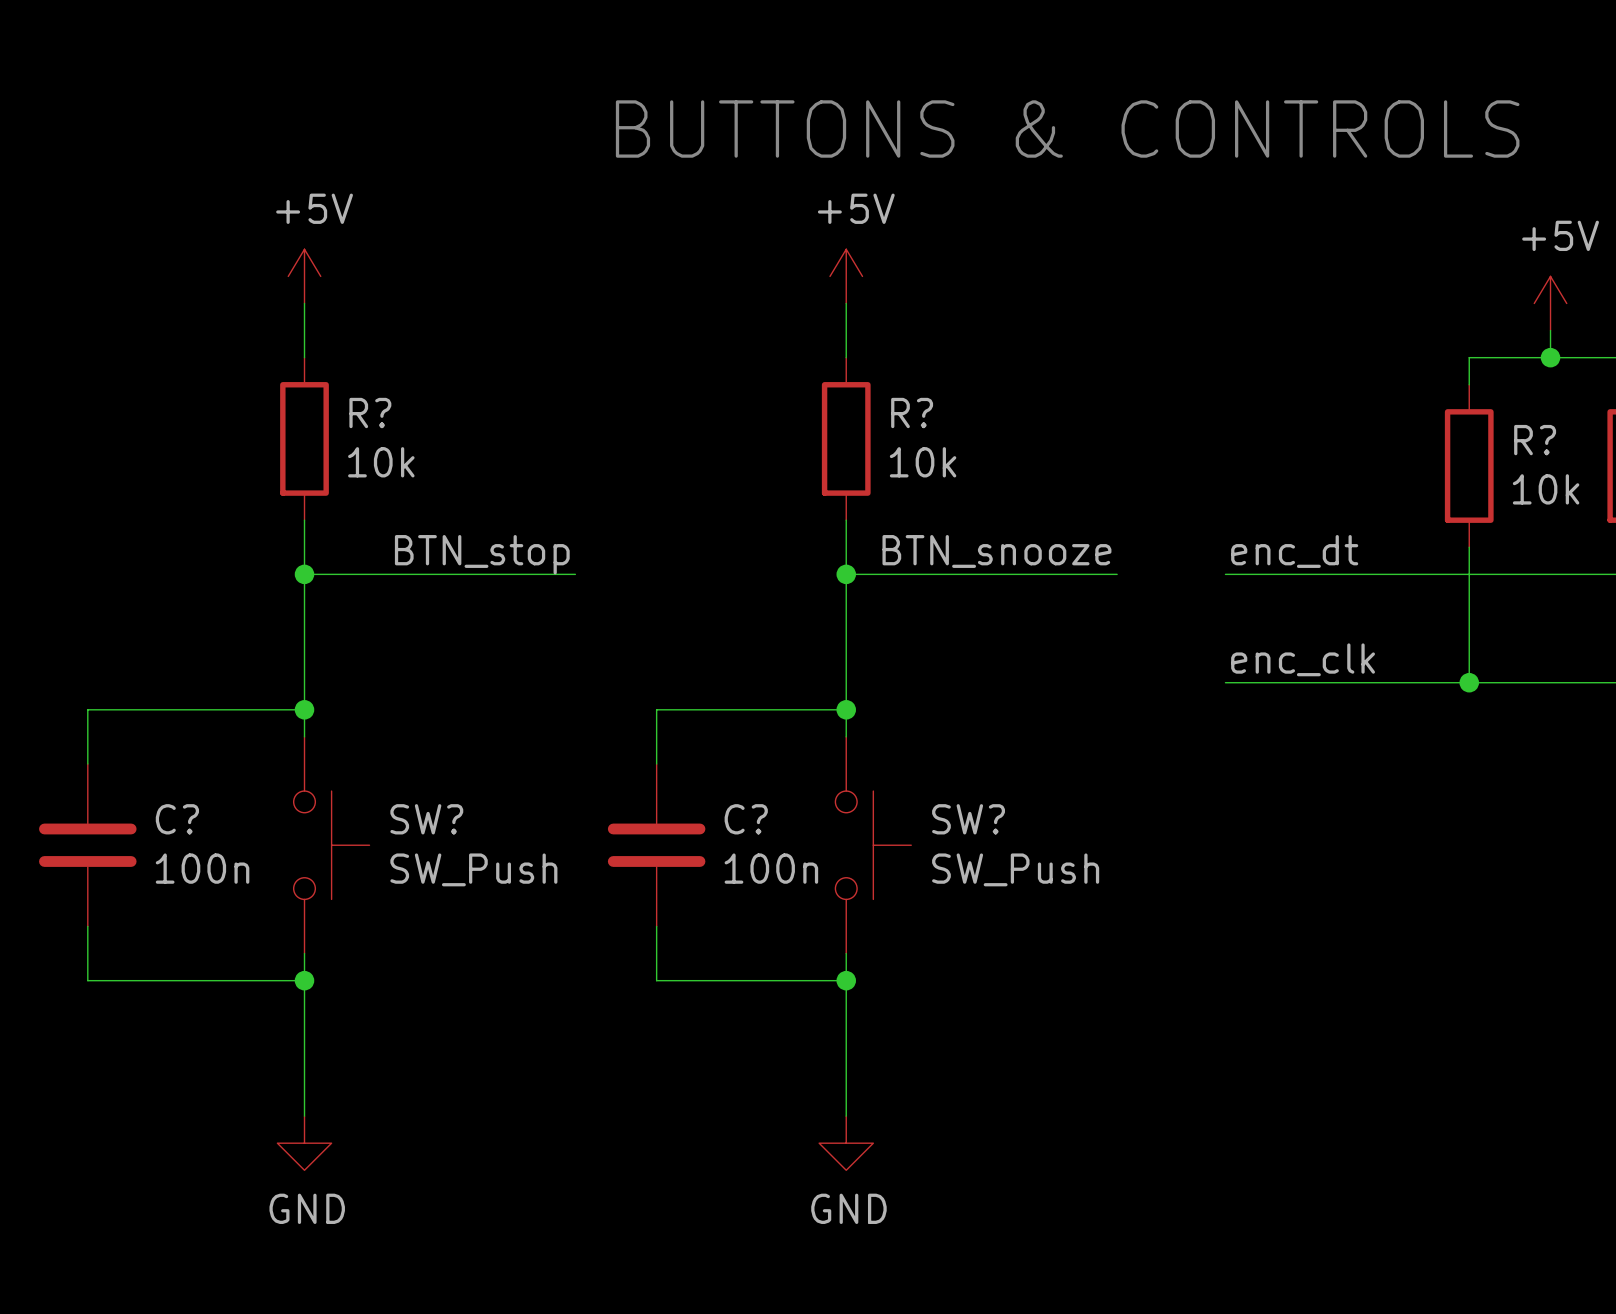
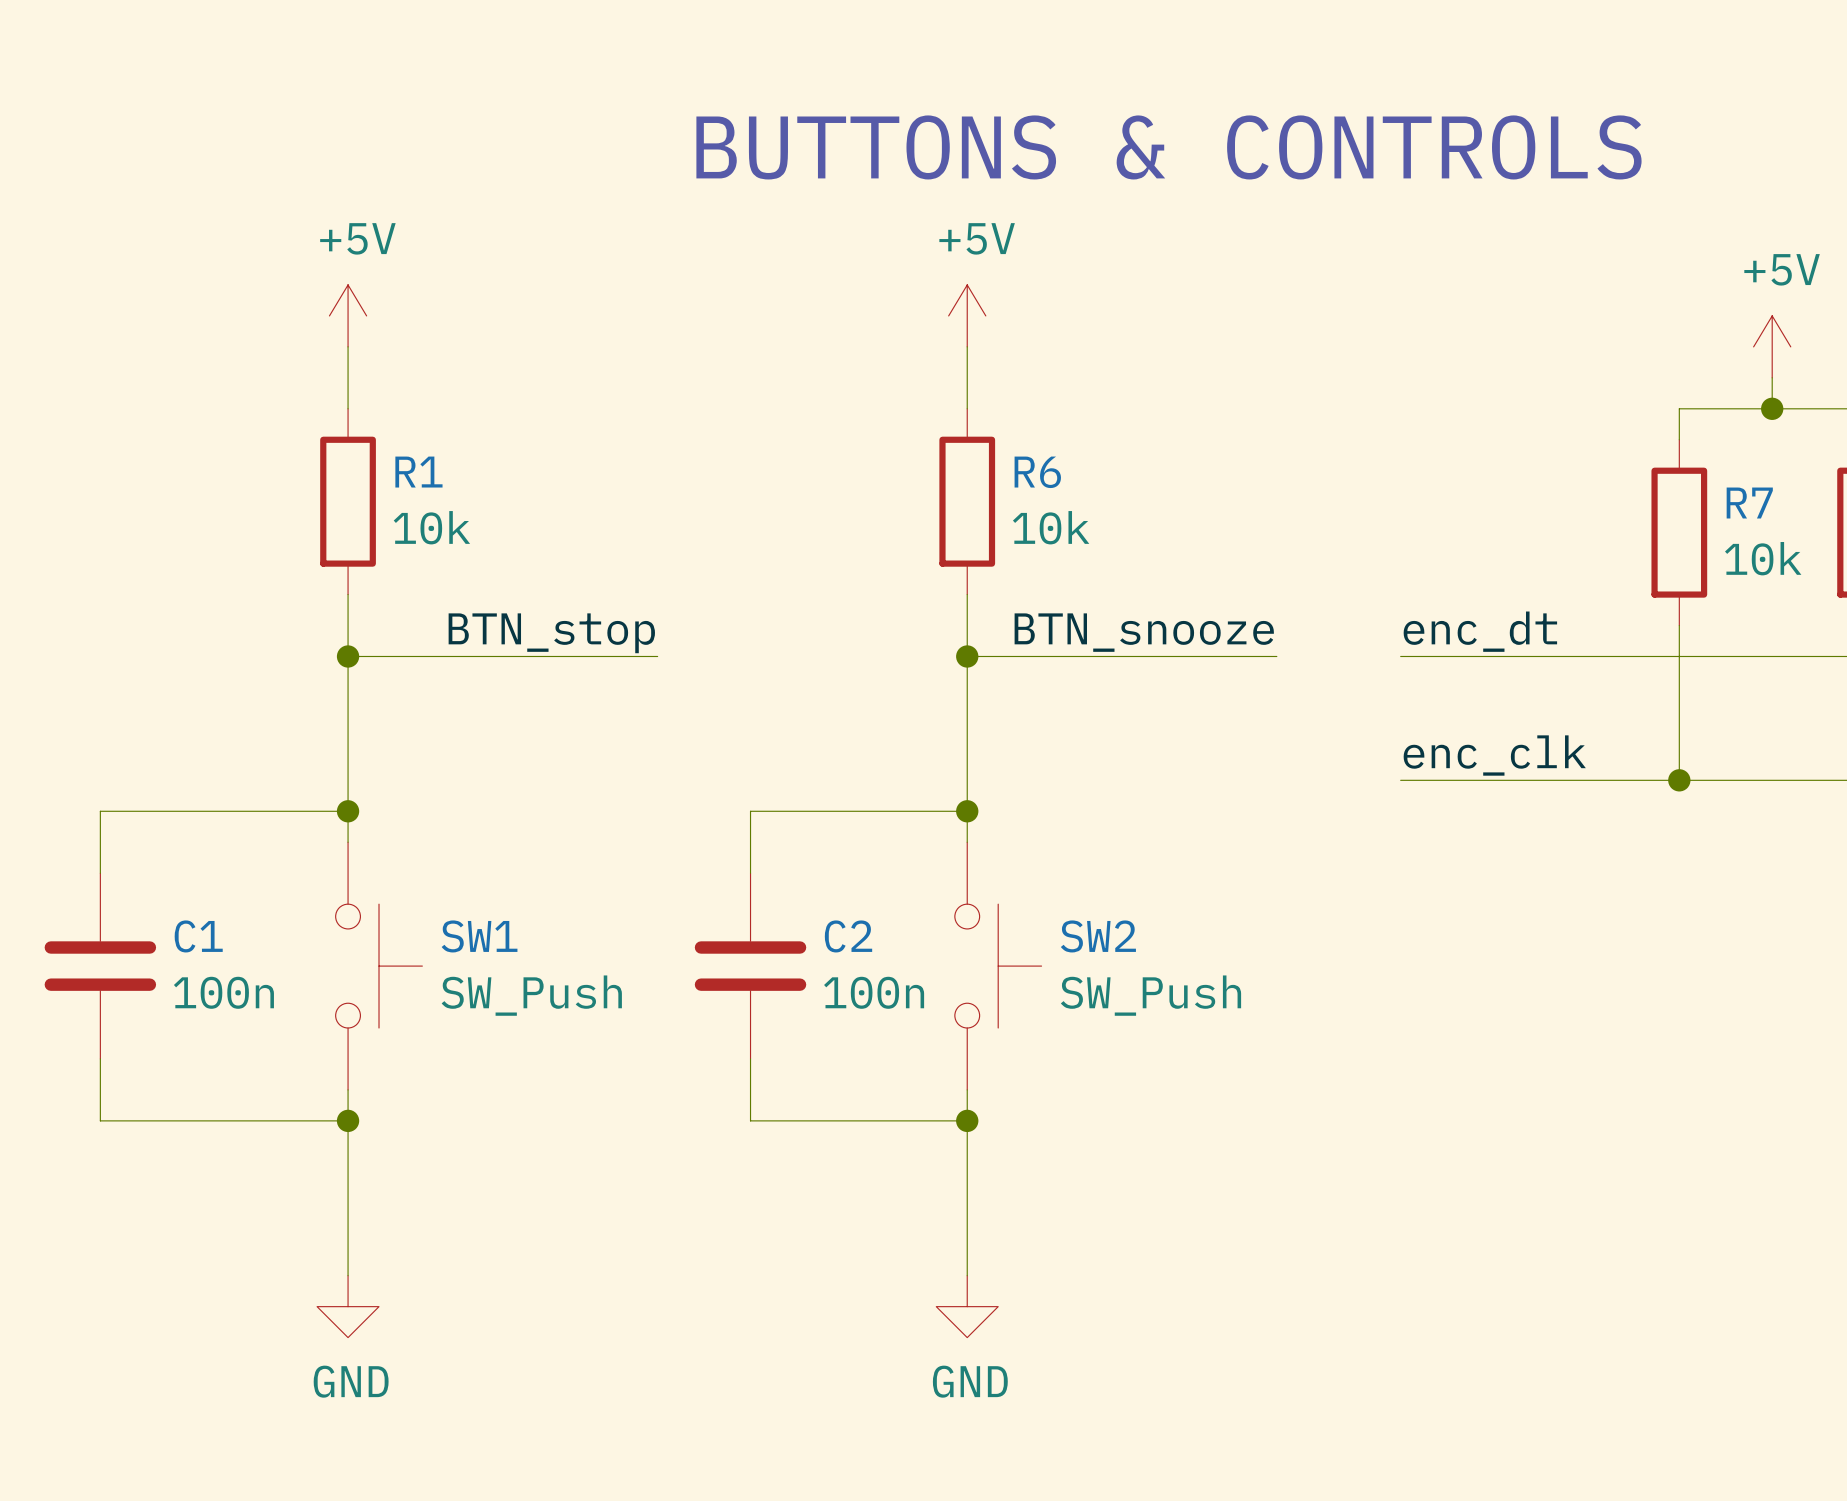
R? name: R? (370, 413) -> R1 (418, 472)
R? name: R? (912, 413) -> R6 (1037, 472)
R? name: R? (1535, 440) -> R7 (1749, 503)
C? name: C? (177, 819) -> C1 (198, 936)
SW? name: SW? (426, 819) -> SW1 (479, 936)
C? name: C? (746, 819) -> C2 (848, 936)
SW? name: SW? (968, 819) -> SW2 (1098, 936)

